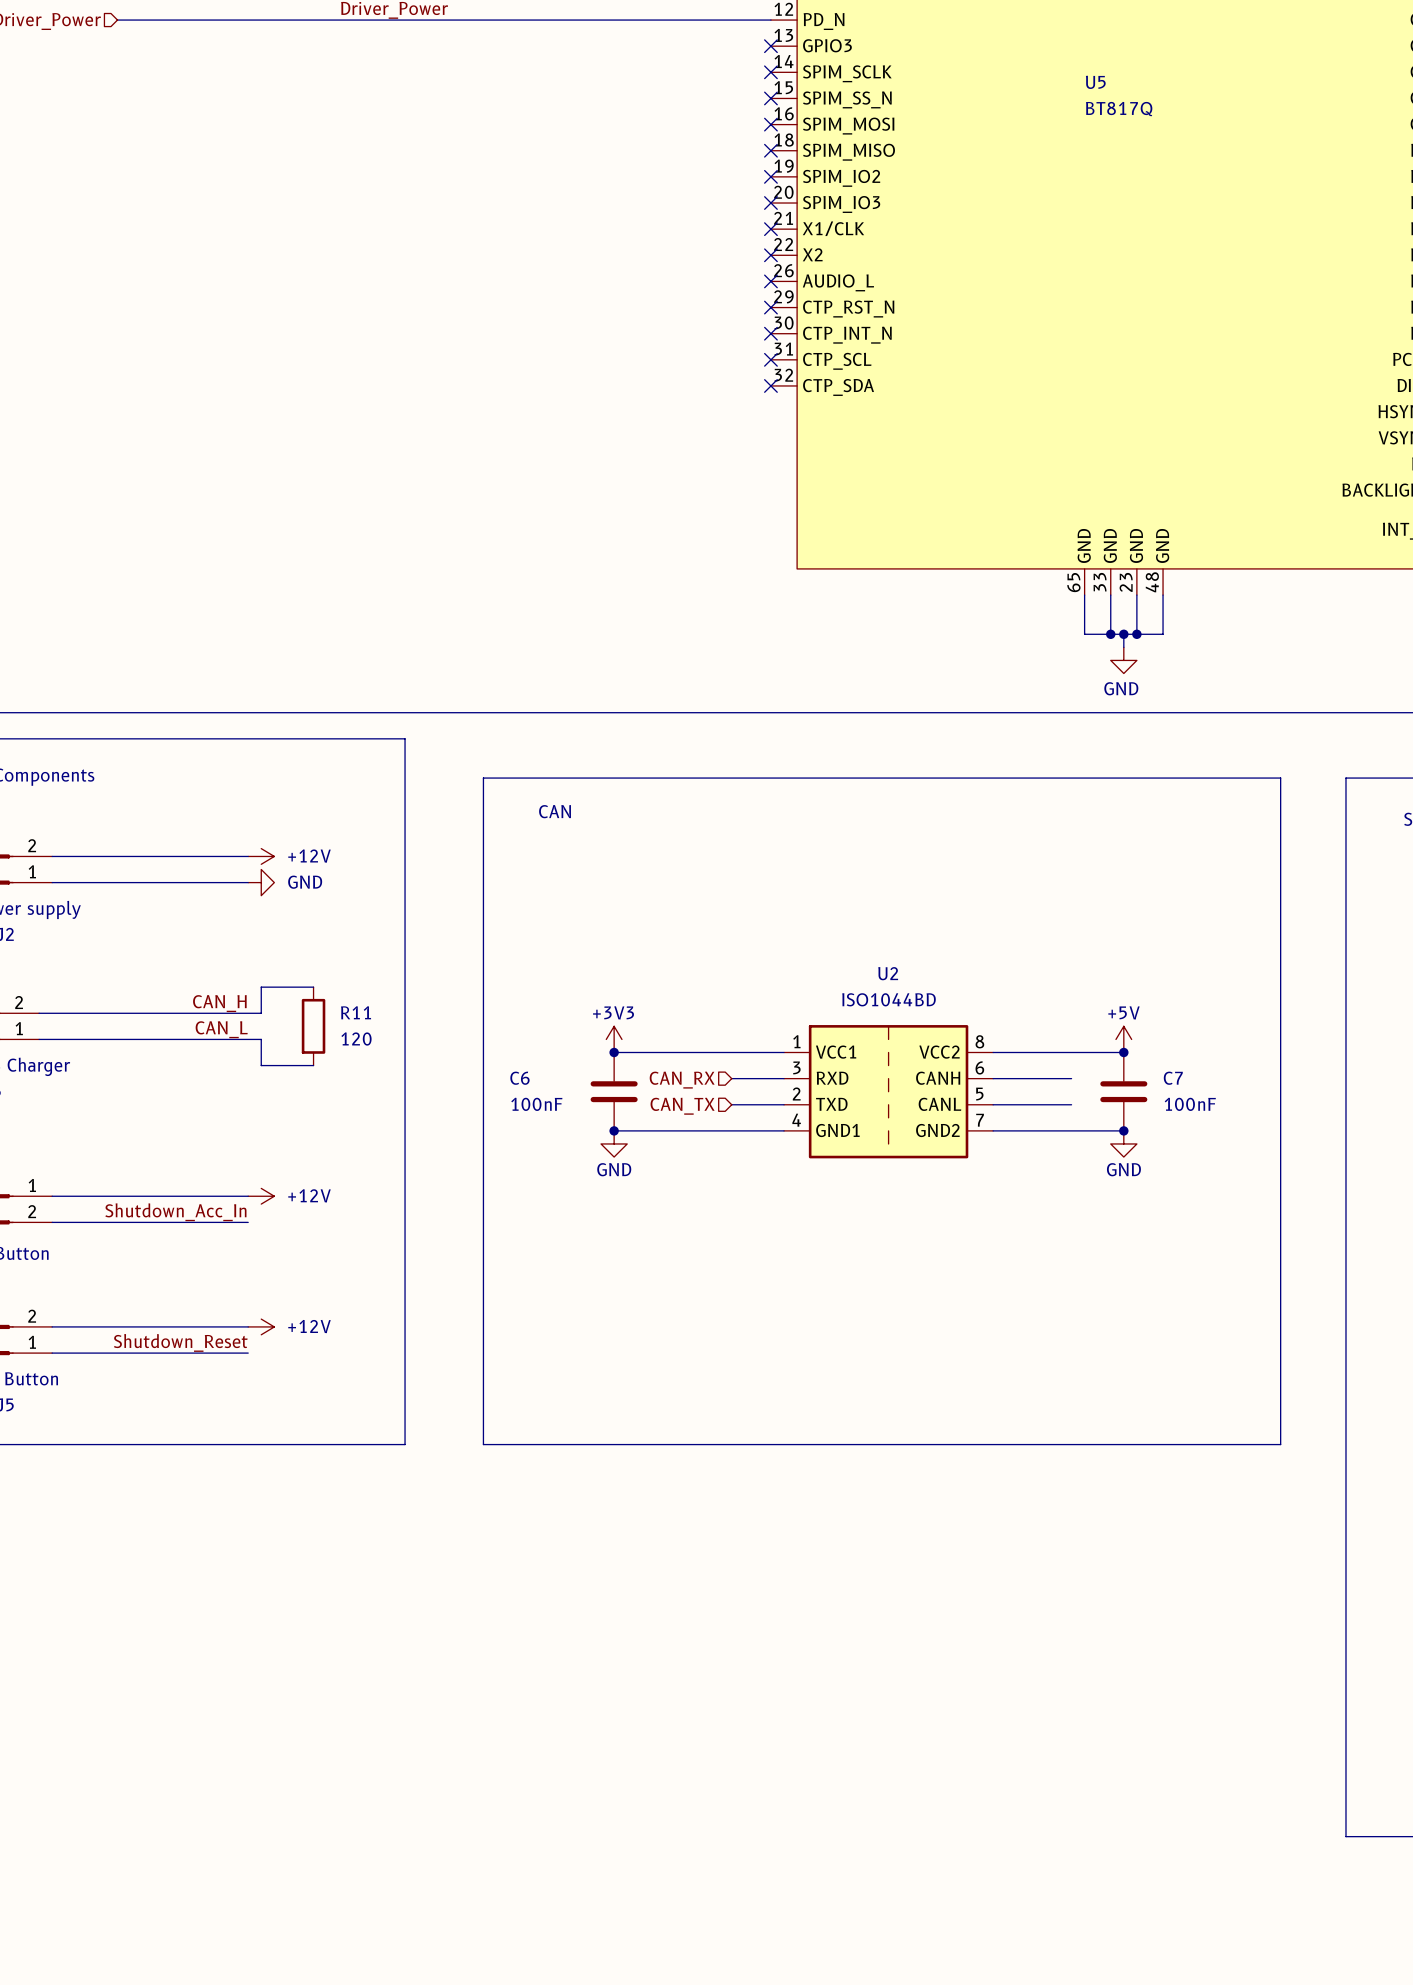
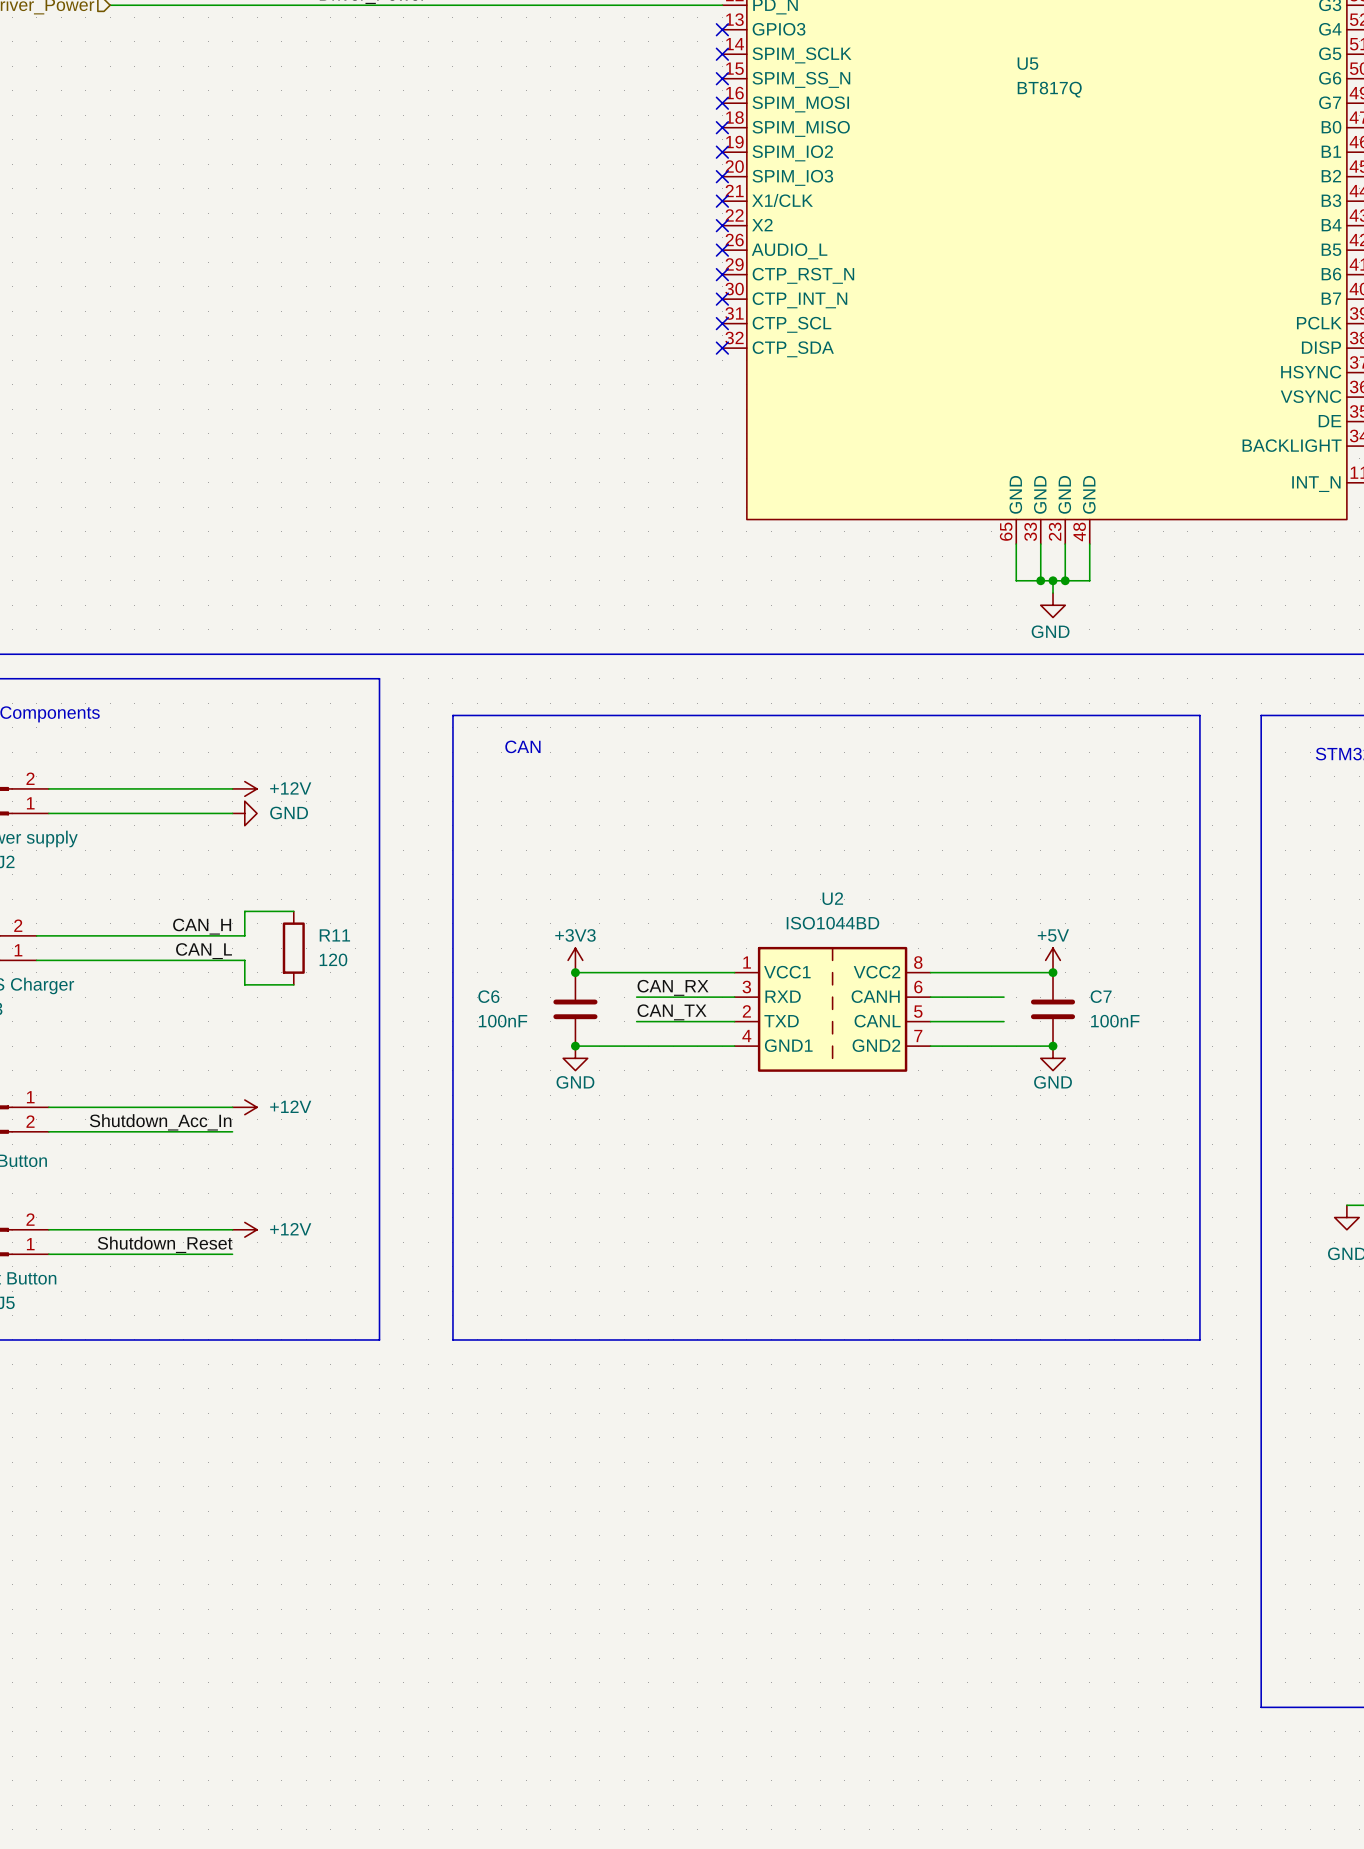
label: none -> CAN_RX (673, 987)
wire: none -> (636, 997) (685, 997)
hierarchical label: CAN_RX (682, 1080) -> none
label: none -> CAN_TX (672, 1012)
wire: none -> (636, 1021) (685, 1021)
hierarchical label: CAN_TX (682, 1106) -> none

